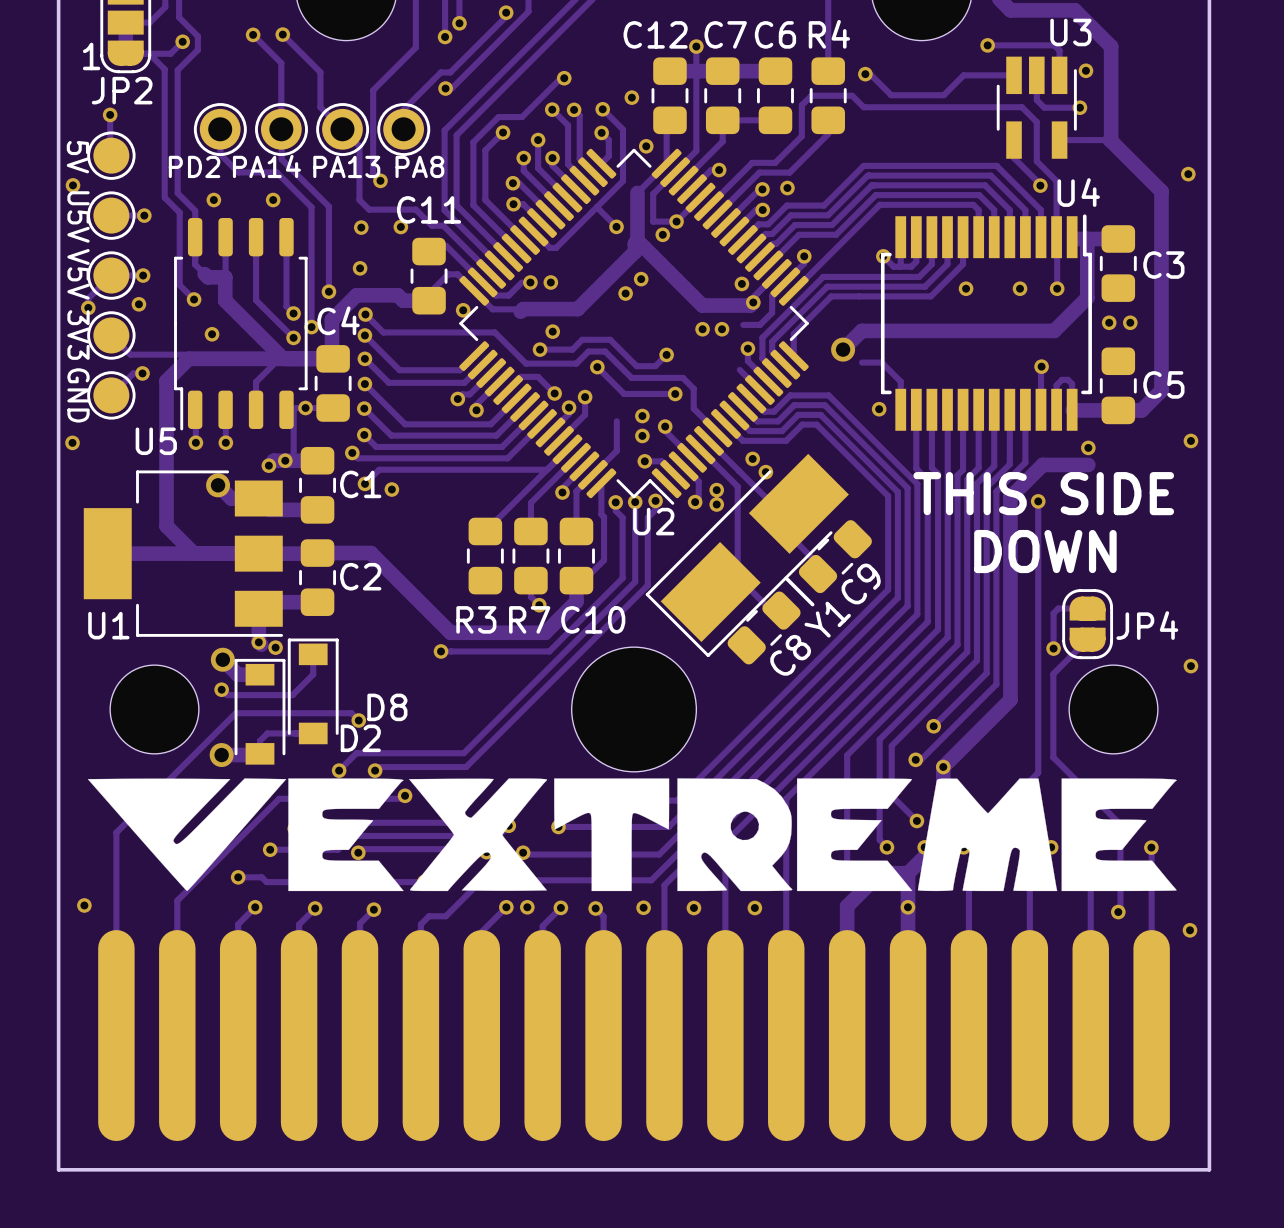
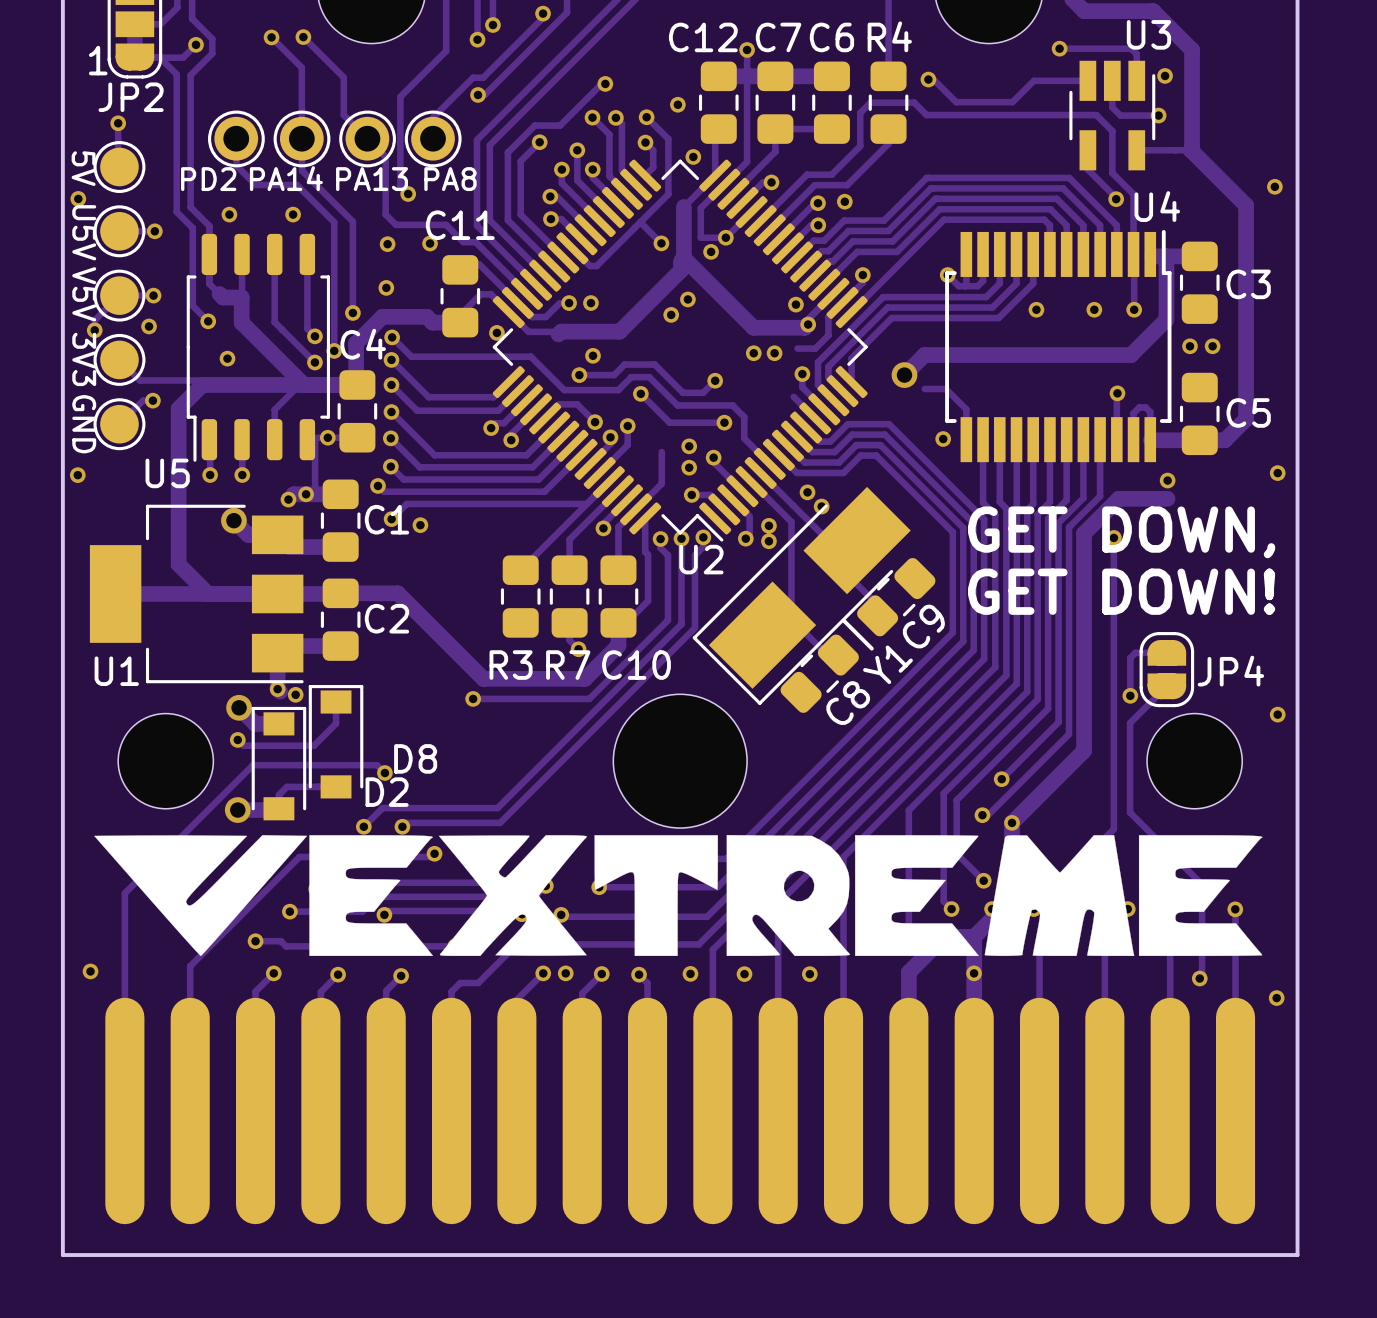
text: THIS SIDE (1043, 493) -> GET DOWN, (1121, 532)
text: DOWN (1045, 551) -> GET DOWN! (1121, 591)

